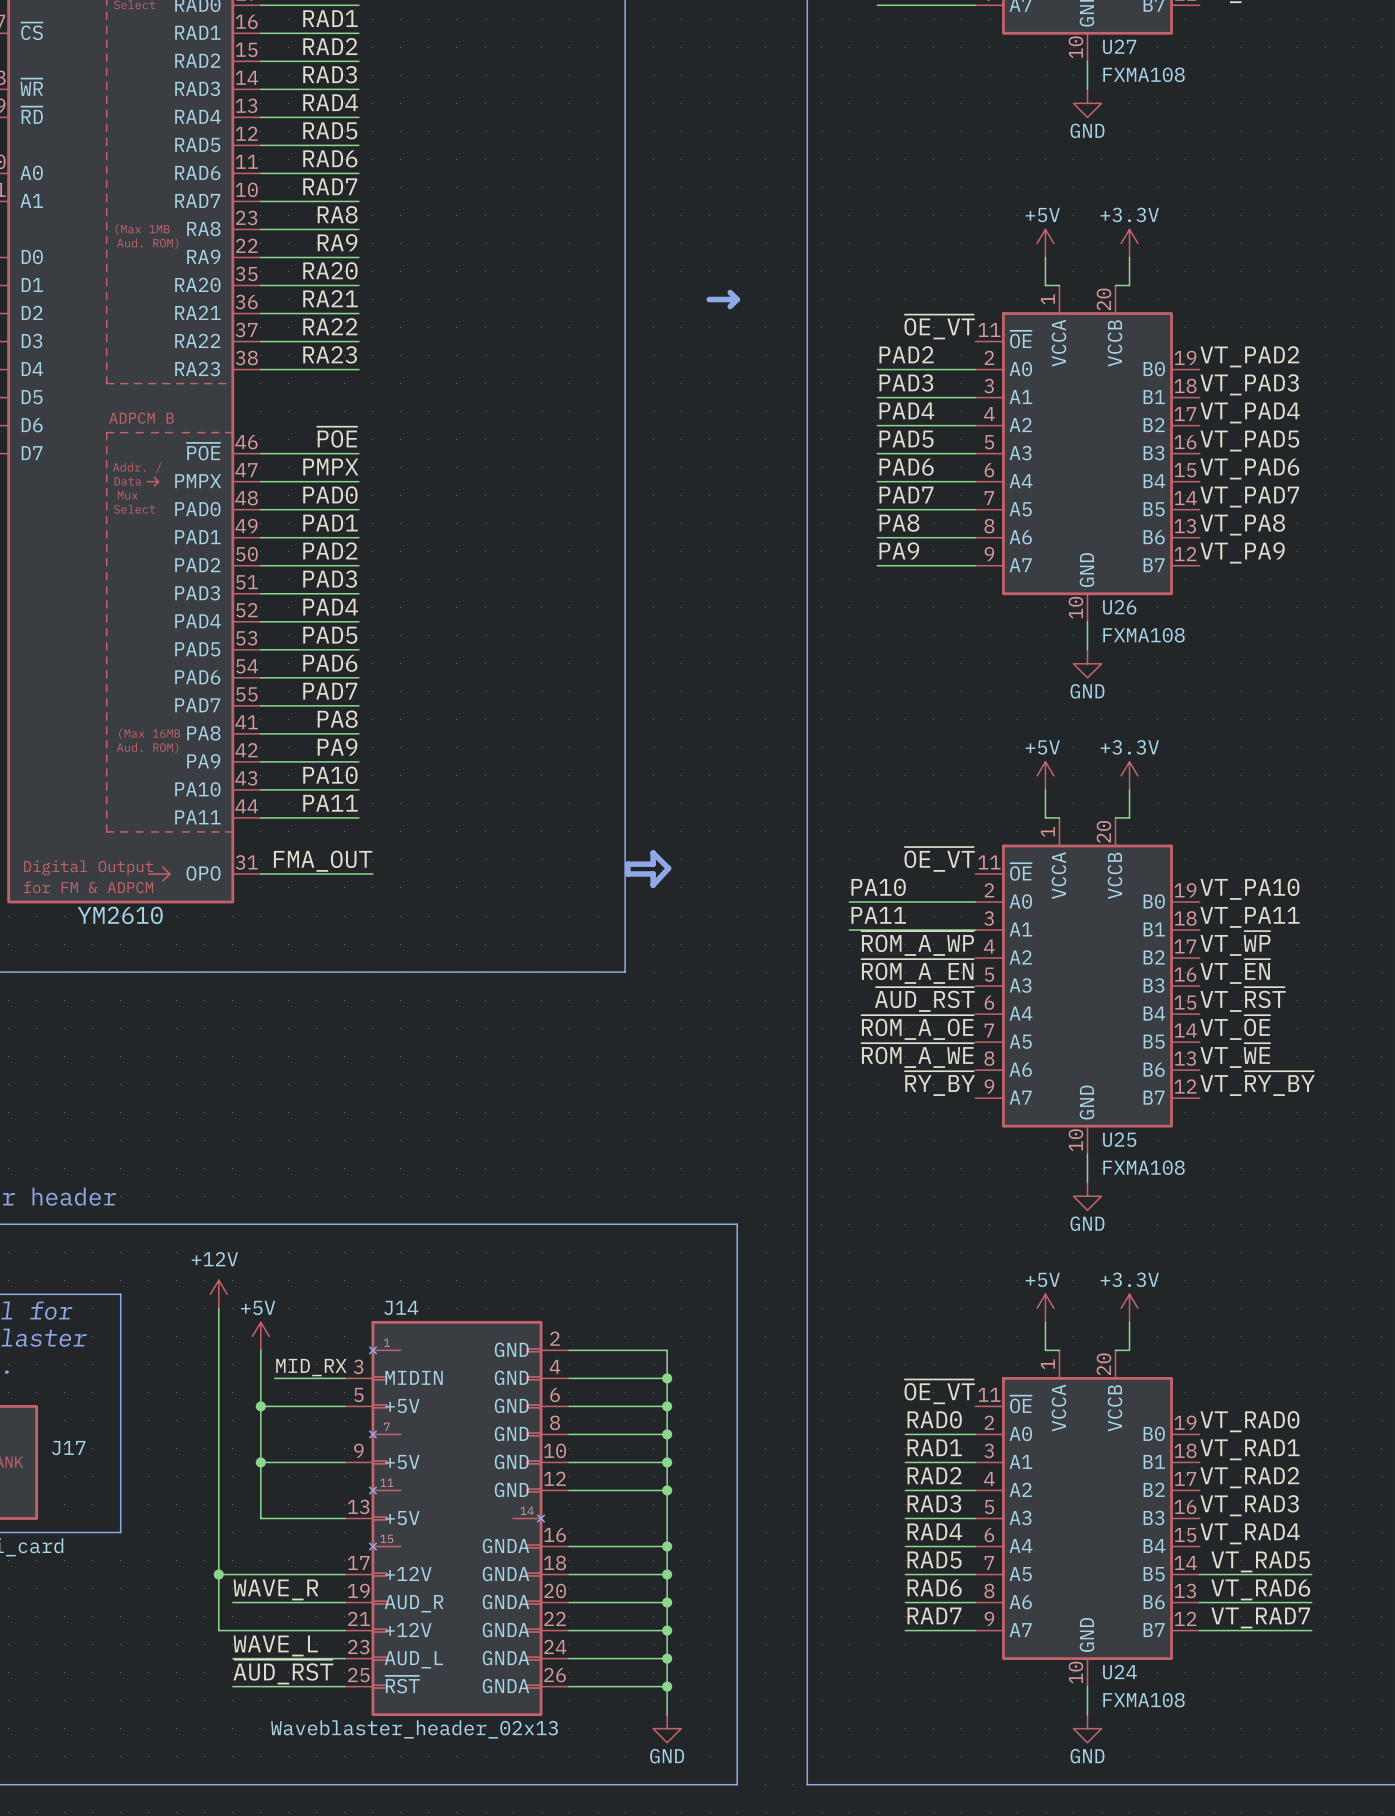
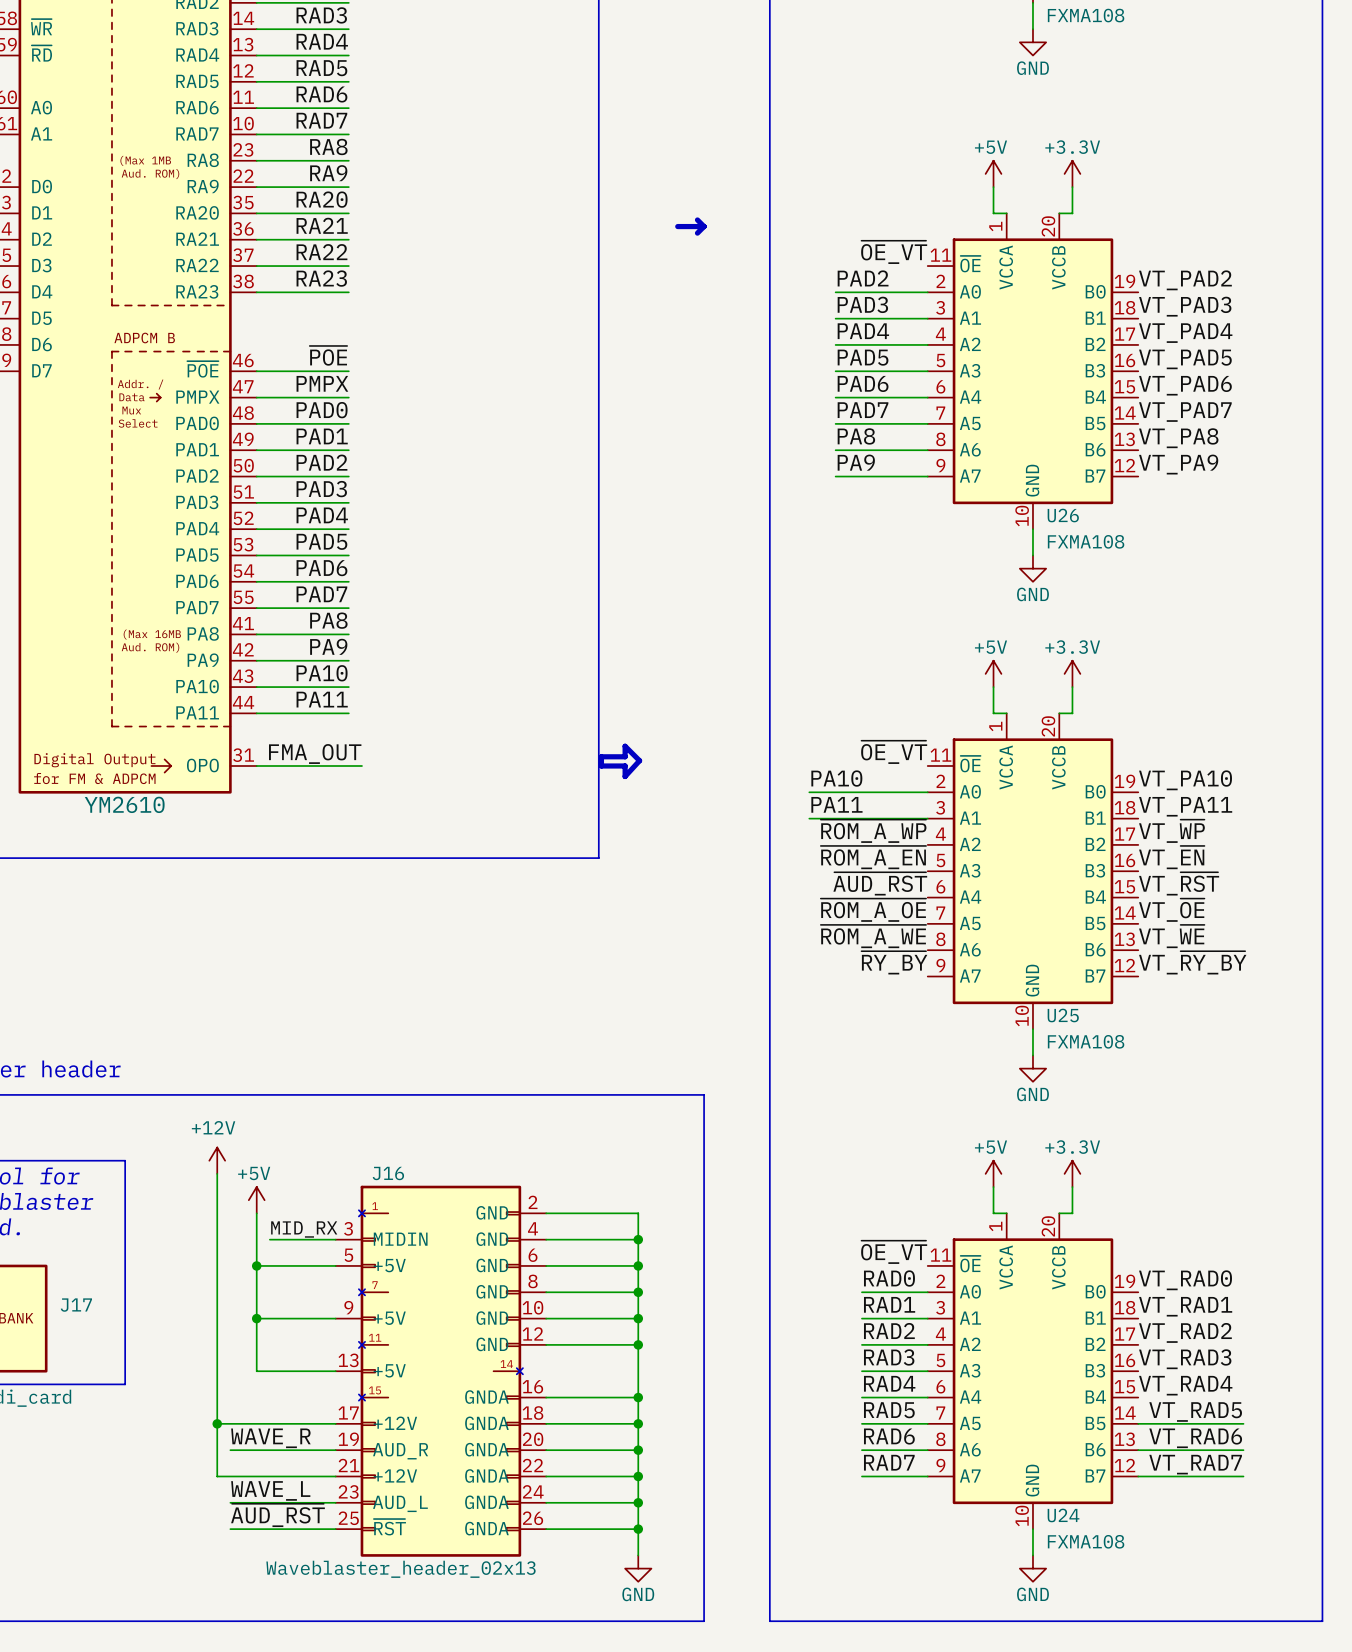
J14 name: J14 (401, 1307) -> J16 (388, 1173)

